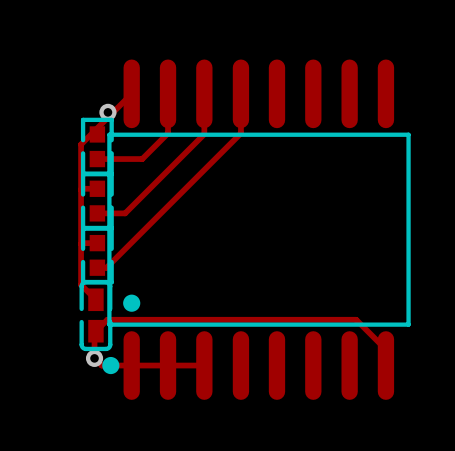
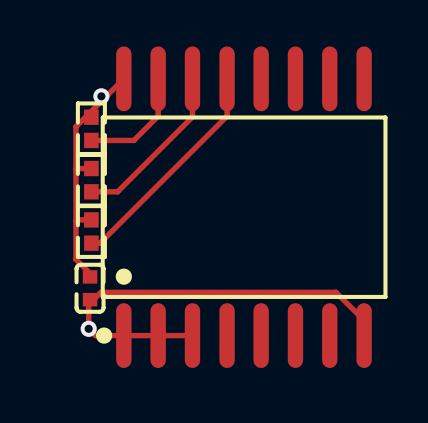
part footprint: [79, 279, 113, 352] -> [74, 262, 106, 314]

